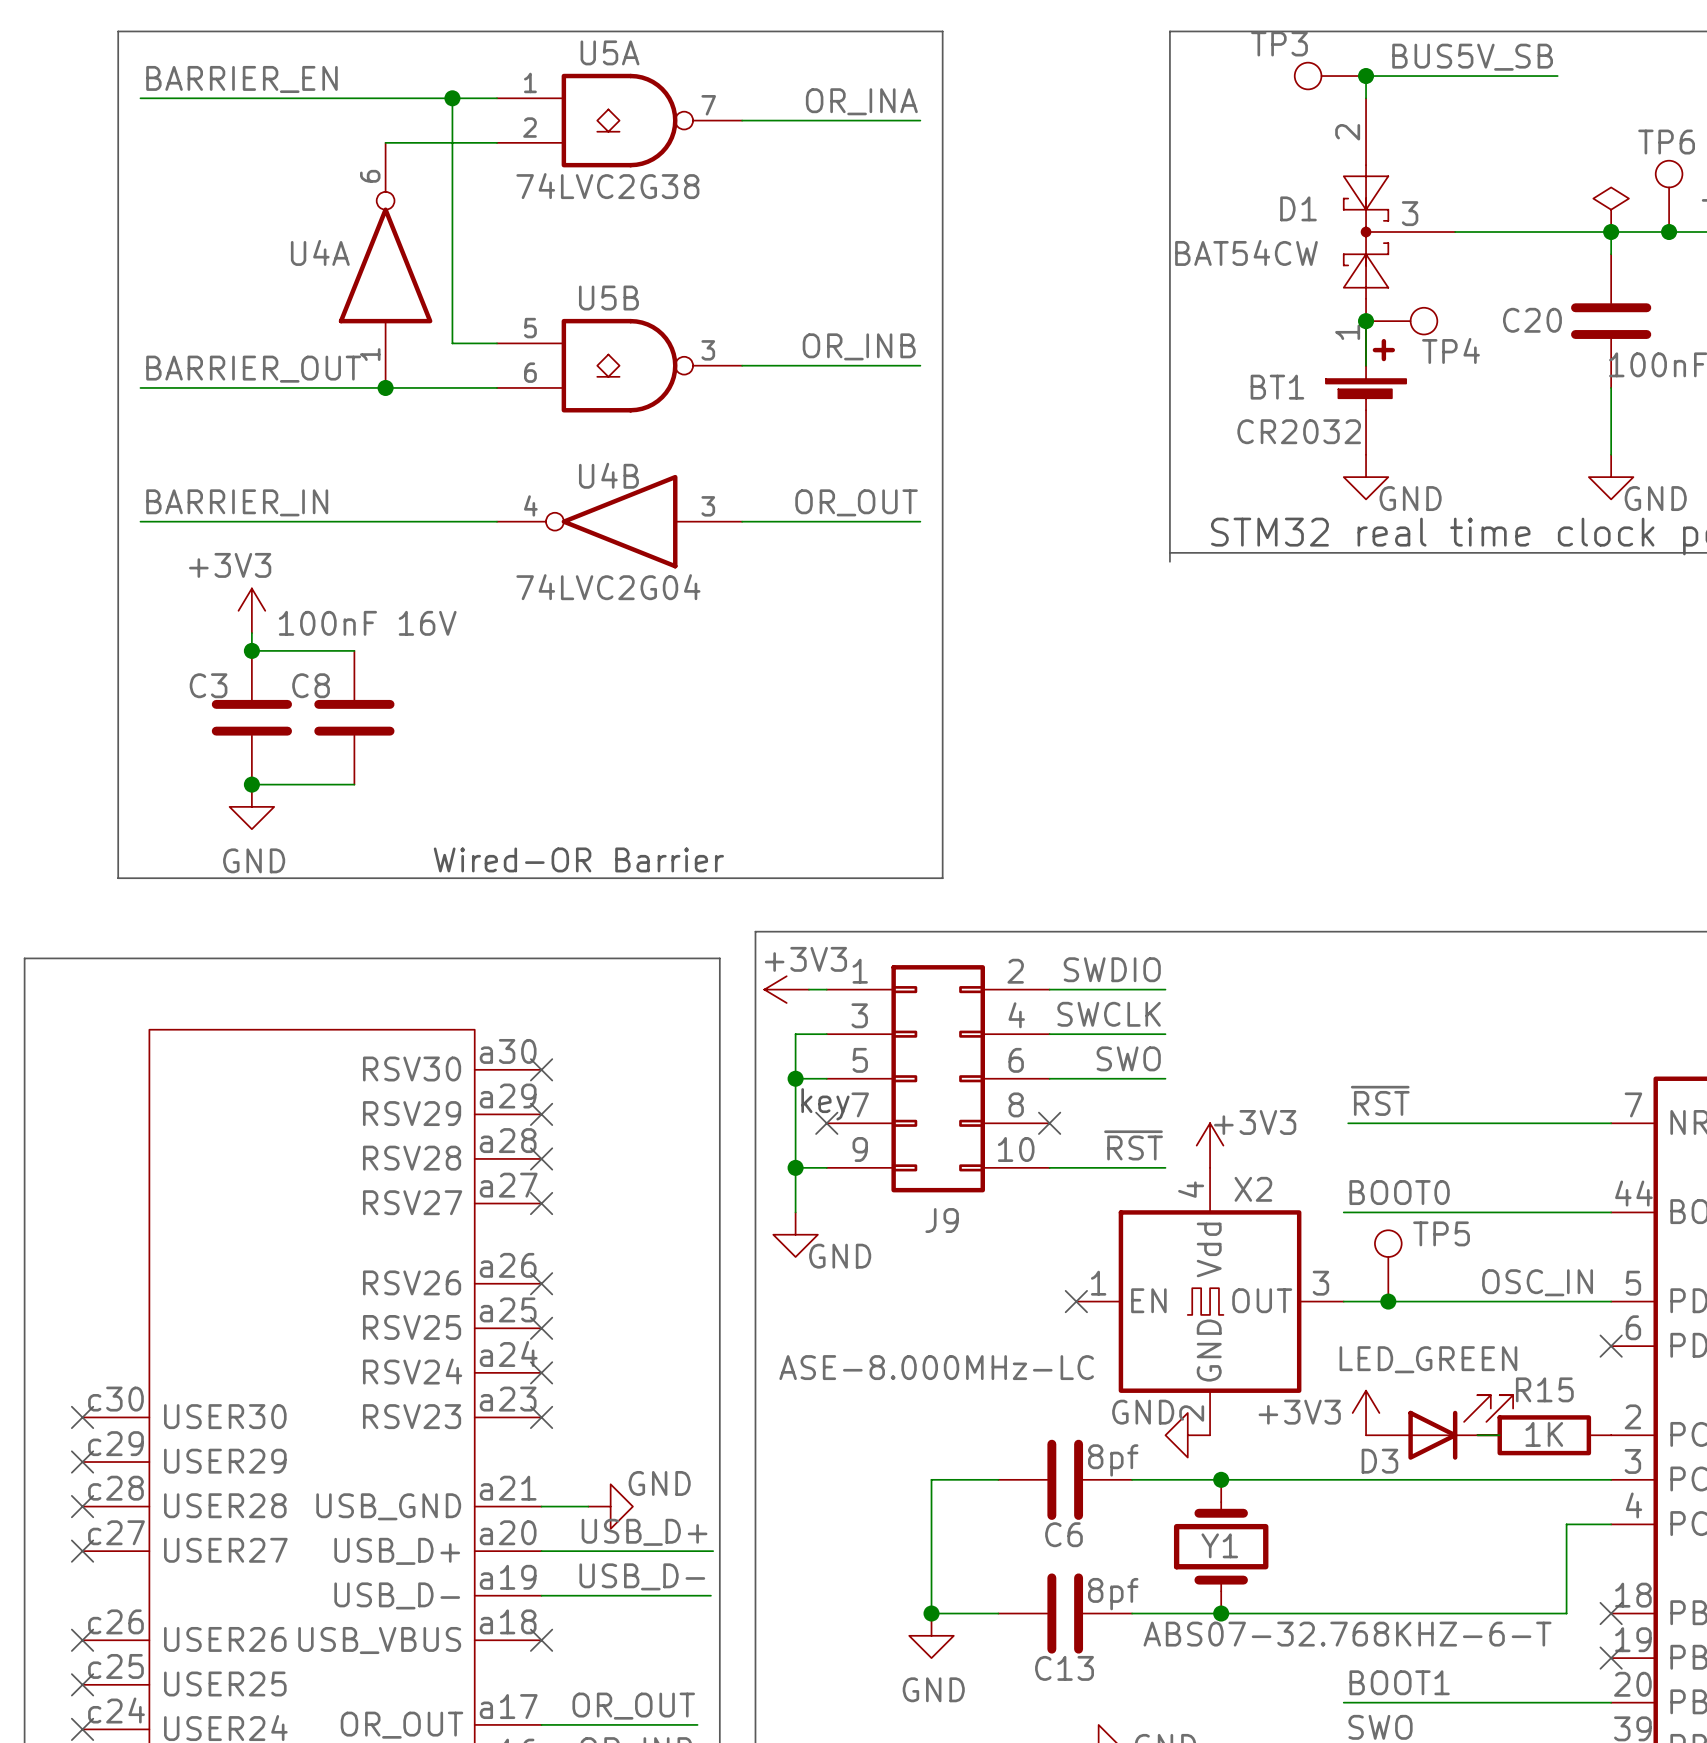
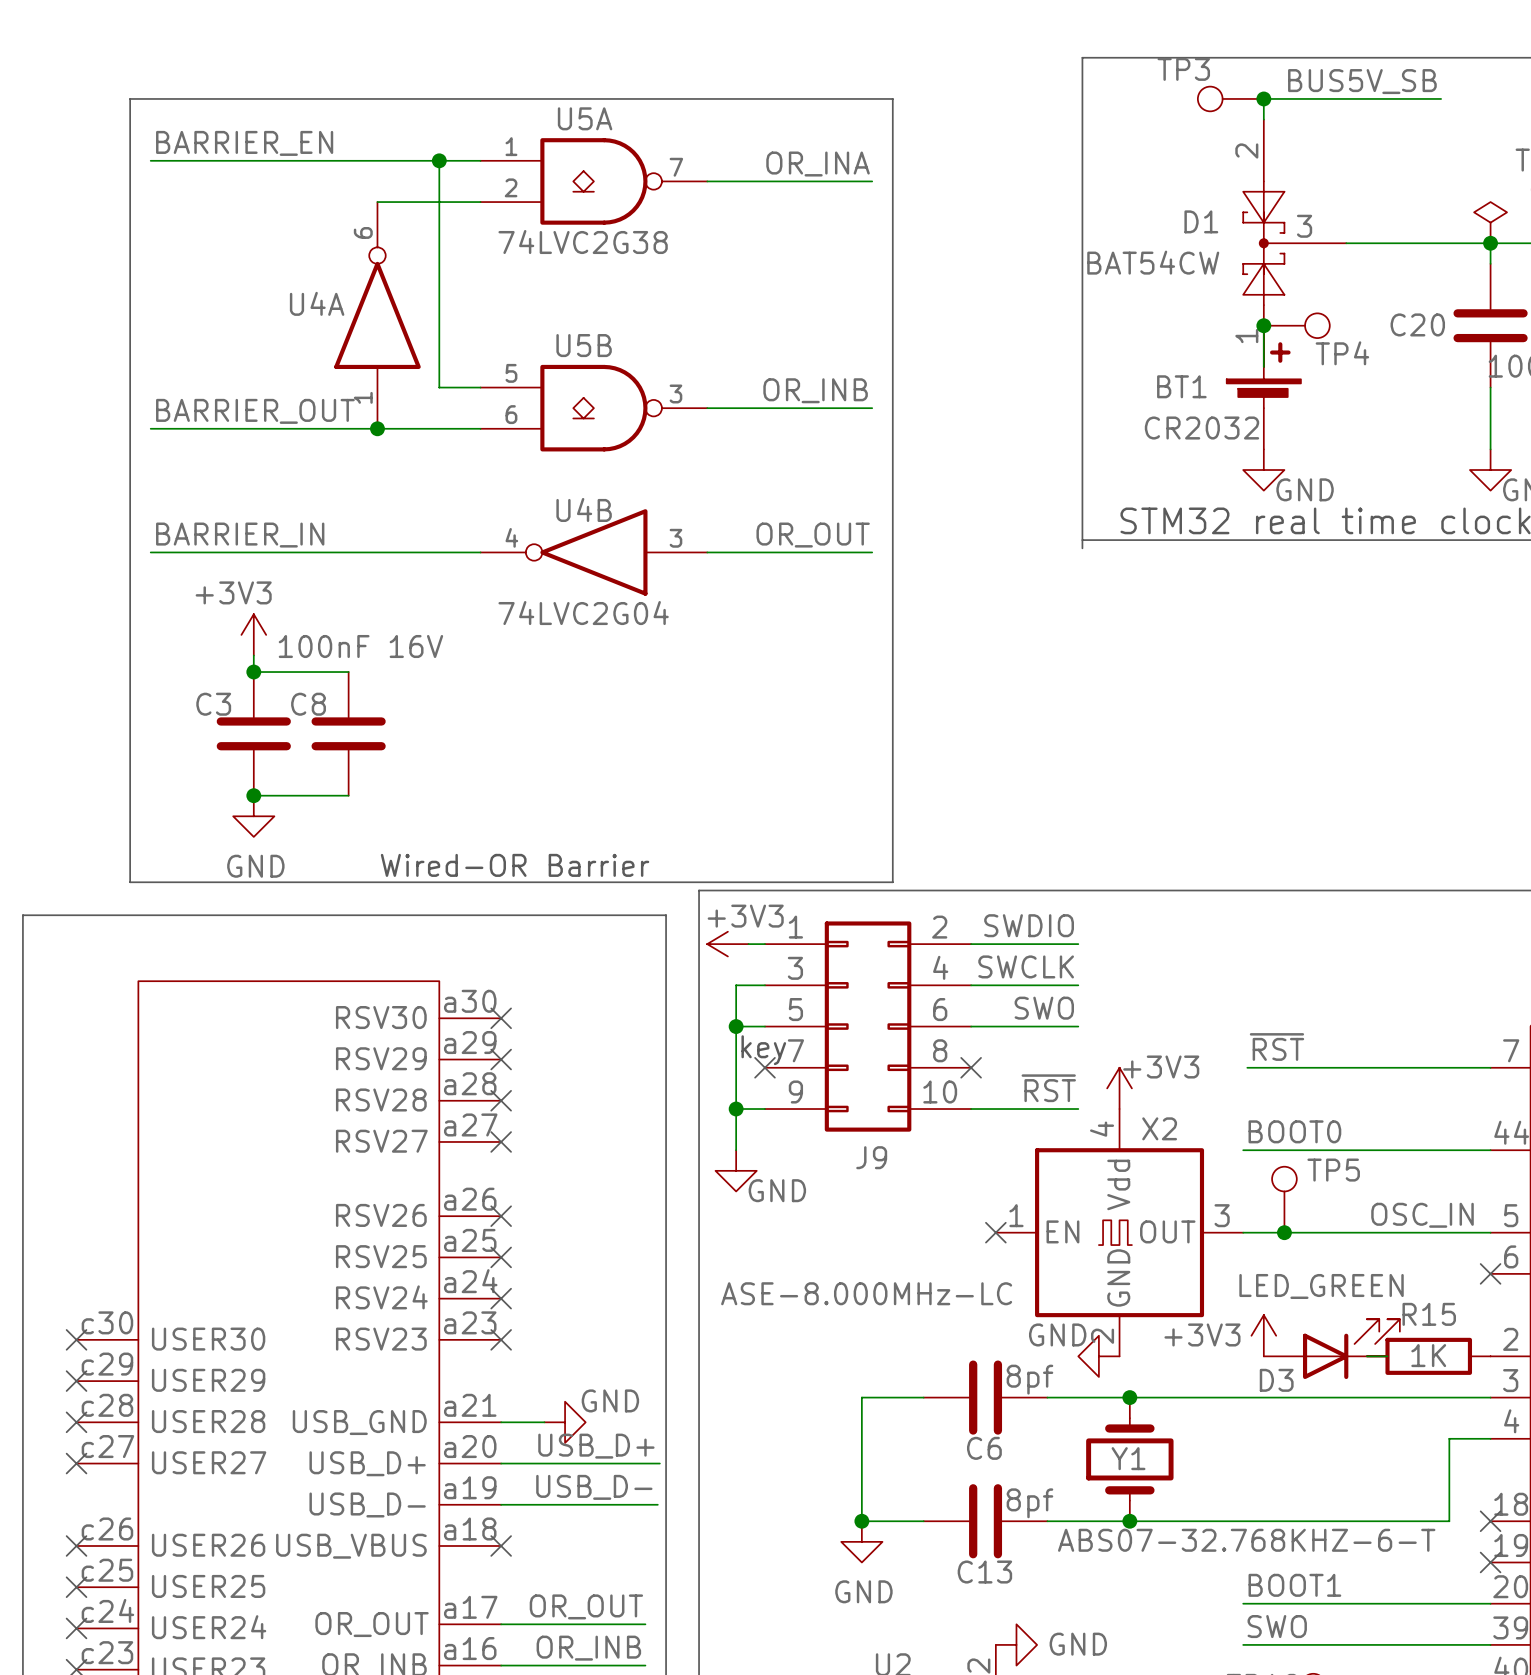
line: (118, 31) (942, 31) (942, 878) (118, 878) (118, 31) -> (130, 98) (892, 98) (892, 882) (130, 882) (130, 98)
label position: BARRIER_EN (241, 79) -> BARRIER_EN (244, 143)
wire: (140, 98) (497, 98) -> (150, 428) (480, 428)
wire: (452, 98) (452, 343) (497, 343) -> none
junction position: (452, 98) -> (439, 160)
label position: OR_INA (861, 101) -> OR_INA (818, 164)
U5A position: (619, 120) -> (593, 181)
wire: (742, 120) (920, 120) -> (707, 181) (872, 181)
wire: none -> (150, 160) (356, 160)
wire: none -> (377, 202) (480, 202)
U4A position: (385, 265) -> (377, 315)
label position: OR_INB (859, 346) -> OR_INB (815, 390)
U5B position: (619, 365) -> (593, 408)
wire: (742, 365) (920, 365) -> (707, 408) (872, 408)
label position: BARRIER_OUT (253, 369) -> BARRIER_OUT (255, 411)
wire: (140, 387) (474, 387) -> (439, 160) (439, 387)
junction position: (385, 387) -> (377, 428)
label position: BARRIER_IN (237, 502) -> BARRIER_IN (240, 535)
label position: OR_OUT (856, 502) -> OR_OUT (813, 535)
wire: (140, 521) (497, 521) -> (150, 552) (480, 552)
U4B position: (619, 521) -> (593, 552)
wire: (742, 521) (920, 521) -> (707, 552) (872, 552)
power symbol position: +3V3 (251, 610) -> +3V3 (253, 634)
wire: (251, 633) (251, 650) (354, 650) -> (253, 655) (253, 672) (348, 672)
junction: (251, 650) -> none
junction: none -> (253, 672)
C3 position: (251, 717) -> (253, 733)
C8 position: (354, 717) -> (348, 733)
wire: (251, 784) (354, 784) -> (253, 795) (348, 795)
junction: (251, 784) -> none
power symbol position: GND (251, 806) -> GND (253, 816)
junction: none -> (253, 795)
text position: Wired-OR Barrier (578, 859) -> Wired-OR Barrier (515, 865)

